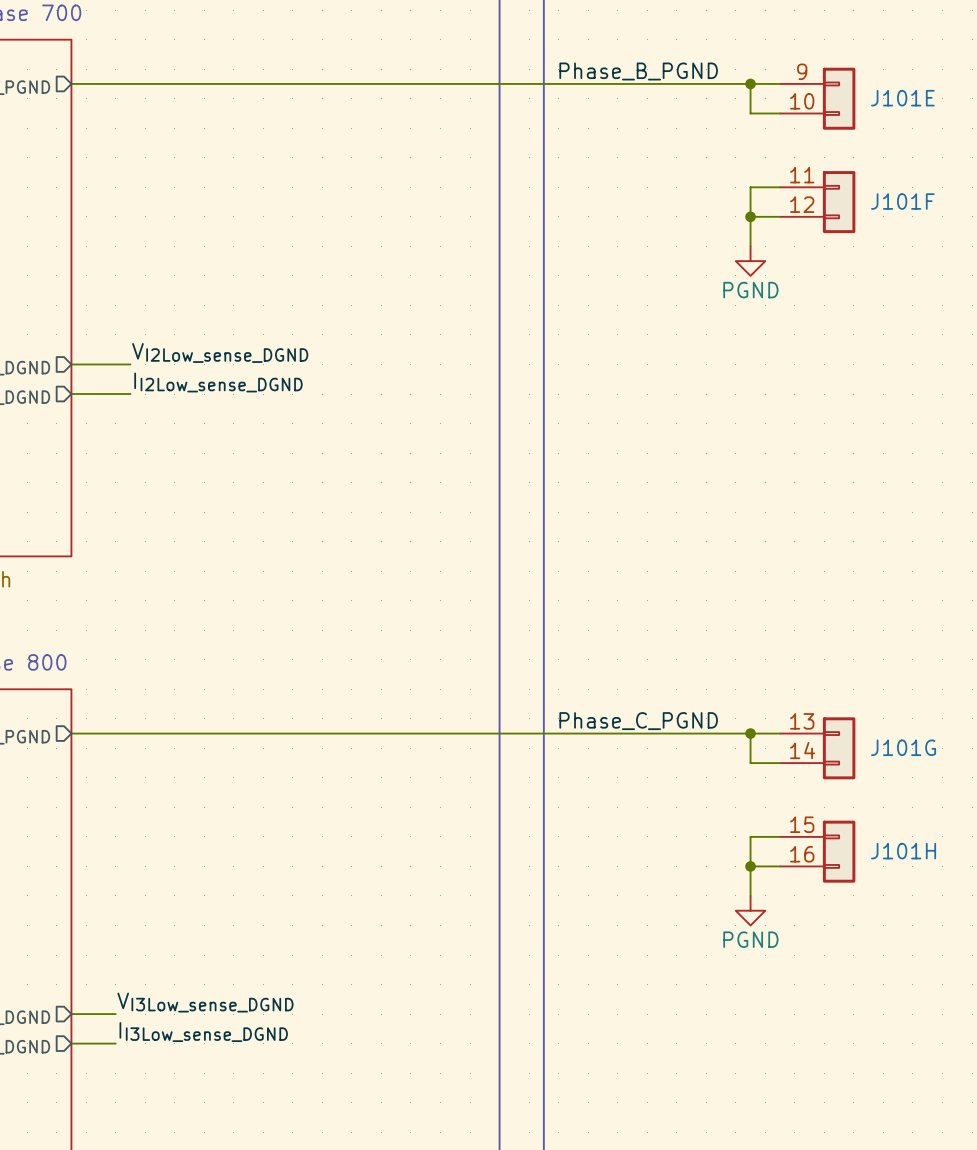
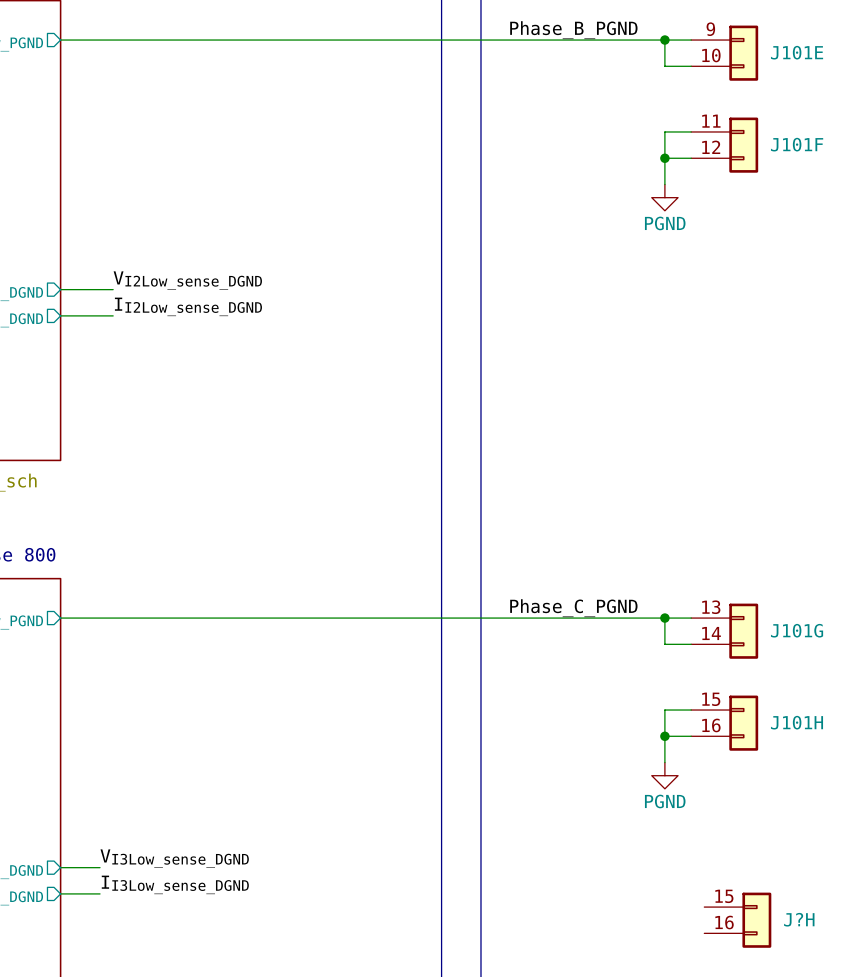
J?H: none -> (737, 920)

